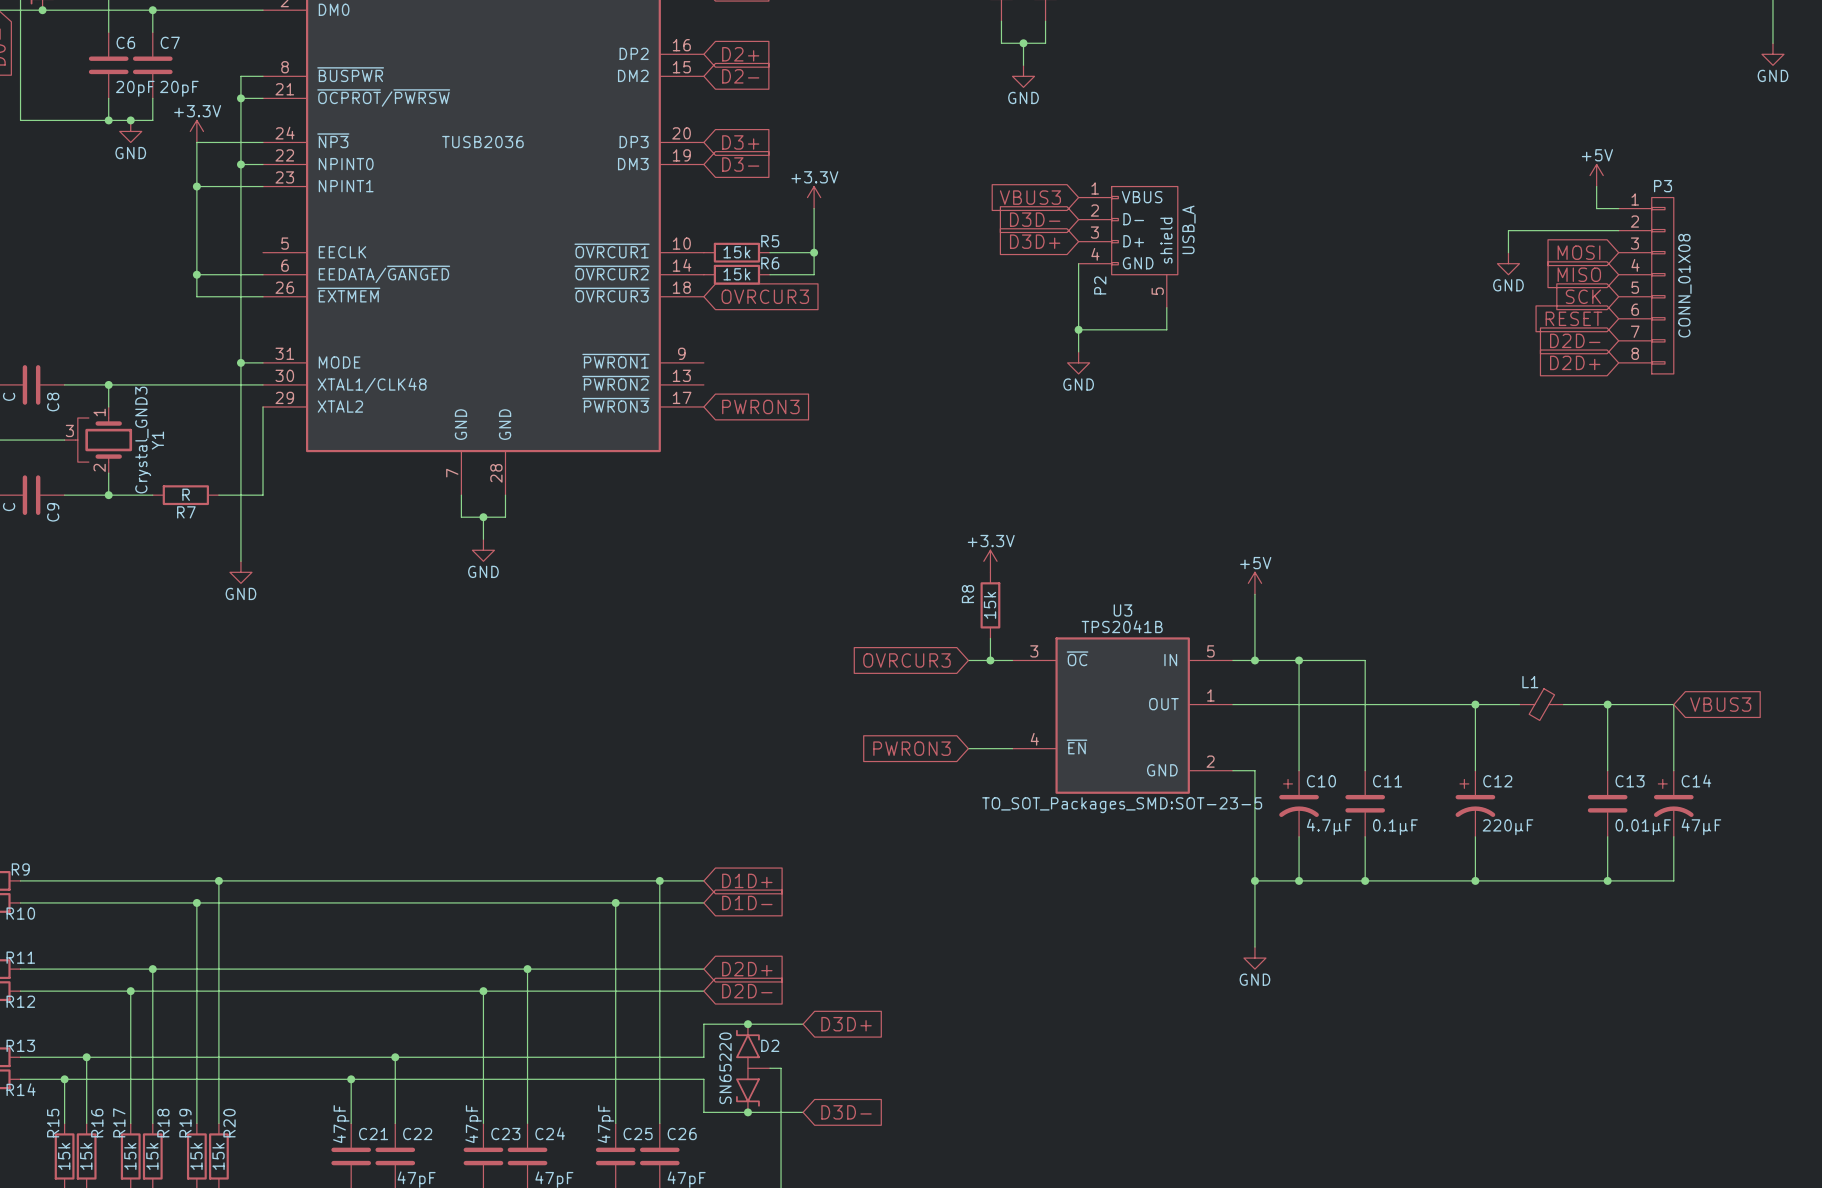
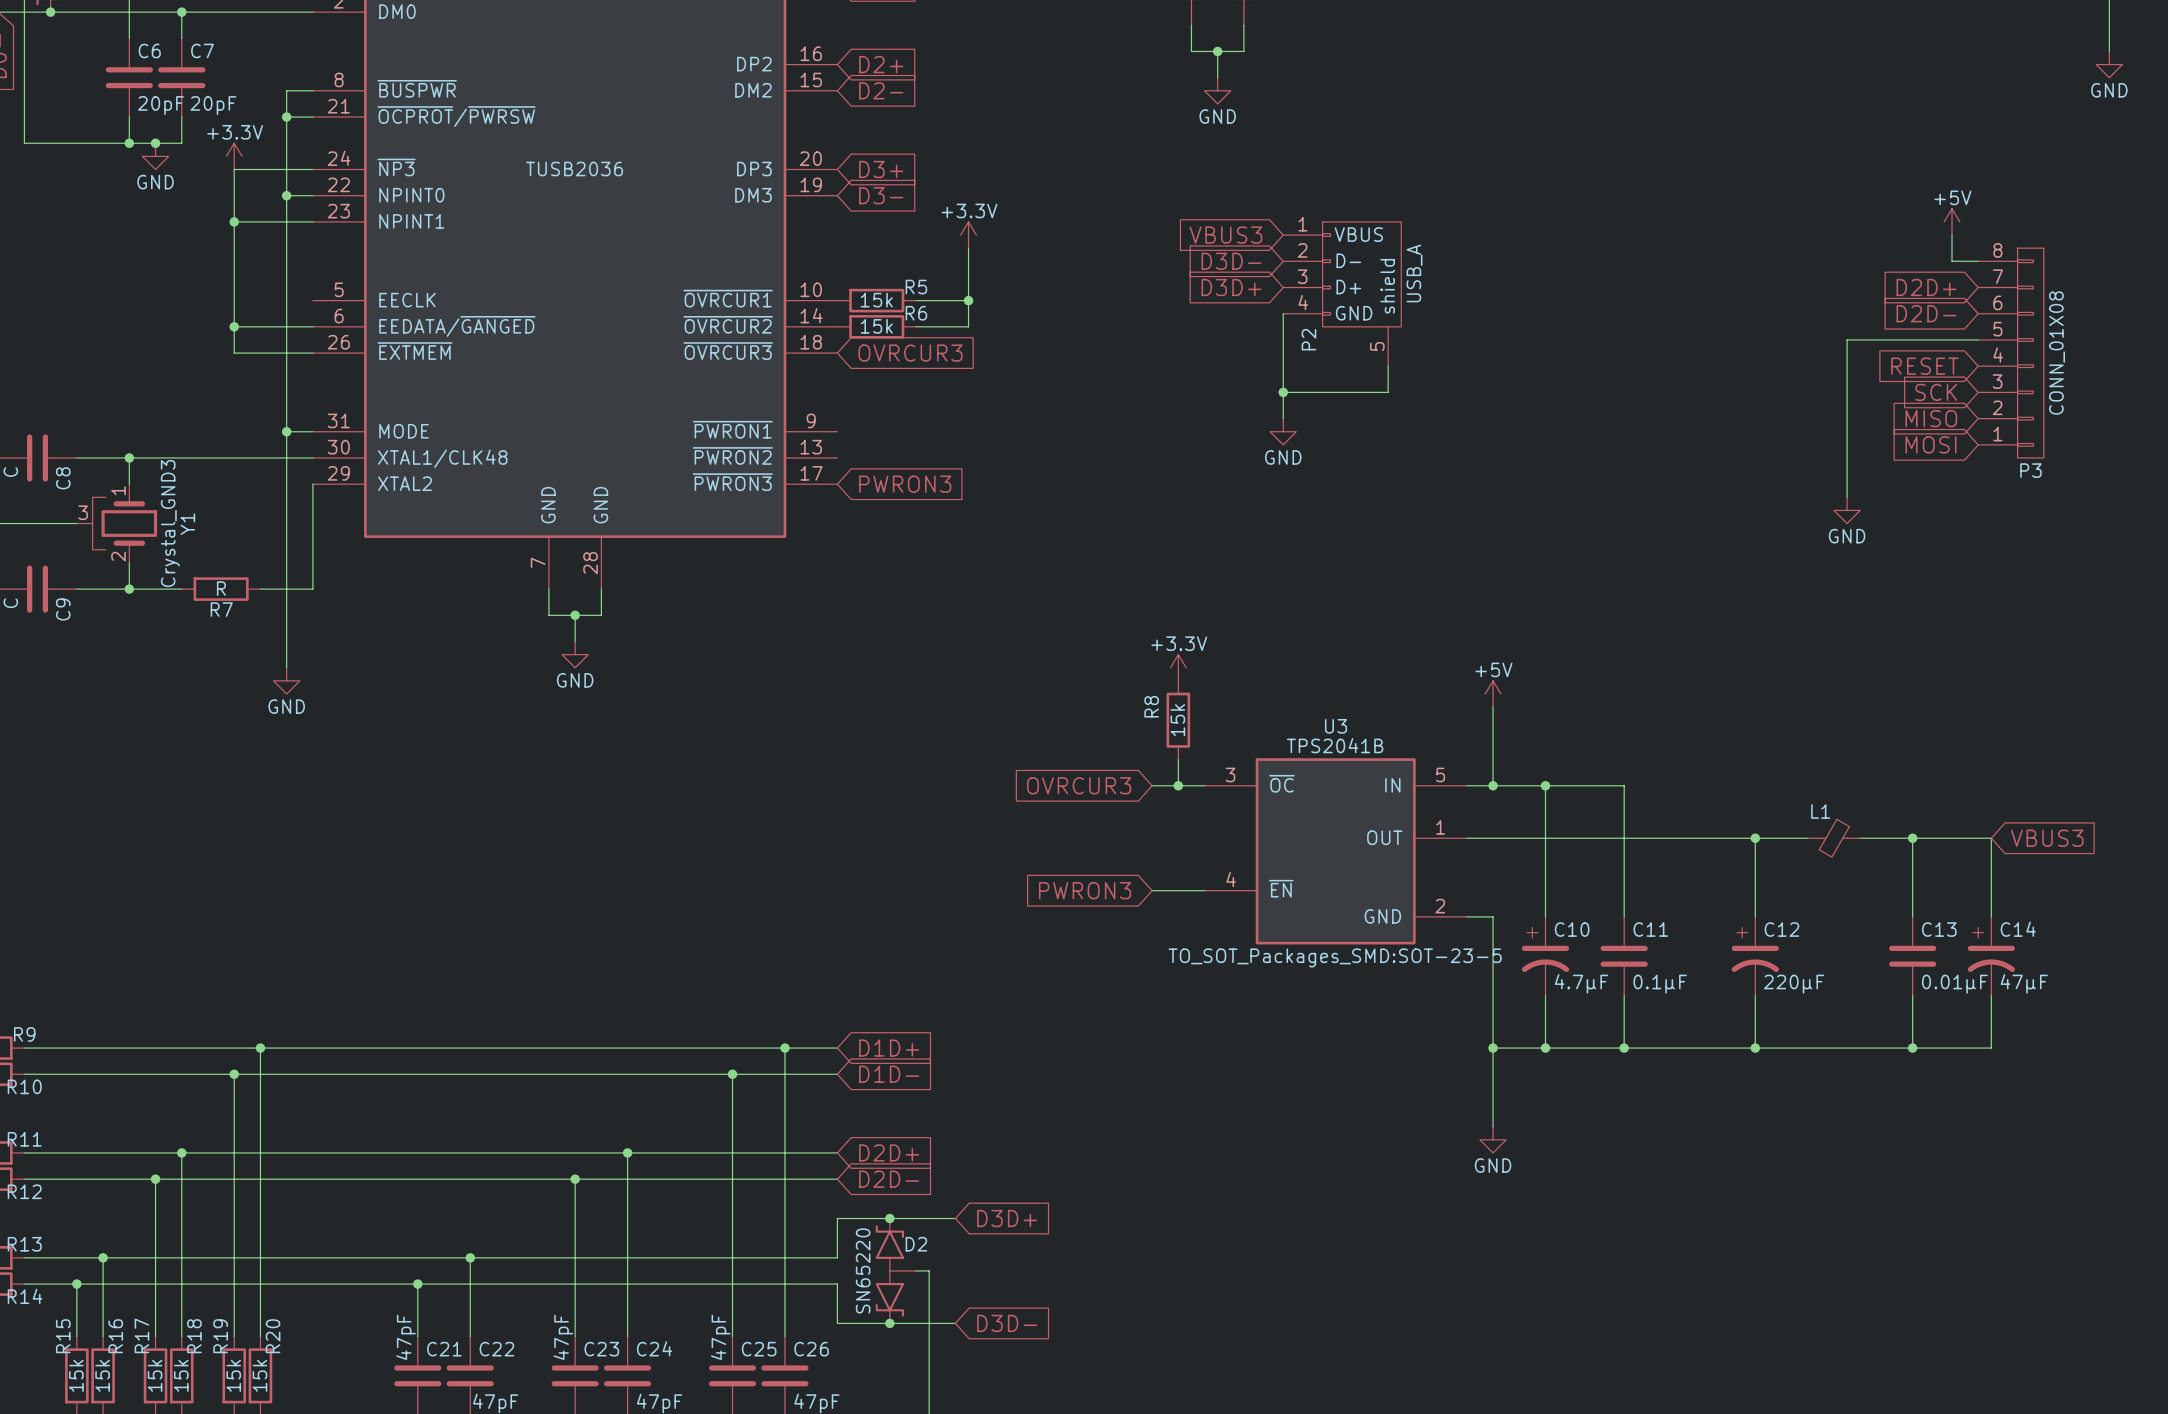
power symbol position: +5V (1596, 175) -> +5V (1952, 221)
wire: (1596, 186) (1596, 208) (1618, 208) -> (1952, 235) (1952, 261) (1978, 261)
wire: (1618, 230) (1508, 230) (1508, 252) -> none
global label position: MOSI (1578, 252) -> MOSI (1931, 444)
power symbol position: GND (1508, 263) -> GND (1847, 510)
global label position: MISO (1579, 274) -> MISO (1931, 418)
wire: none -> (1978, 339) (1847, 339) (1847, 497)
P3 flip: as is (1662, 285) -> up-down (2030, 353)
global label position: SCK (1583, 296) -> SCK (1936, 392)
global label position: RESET (1573, 318) -> RESET (1925, 366)
global label position: D2D- (1575, 340) -> D2D- (1926, 313)
global label position: D2D+ (1575, 362) -> D2D+ (1926, 287)

